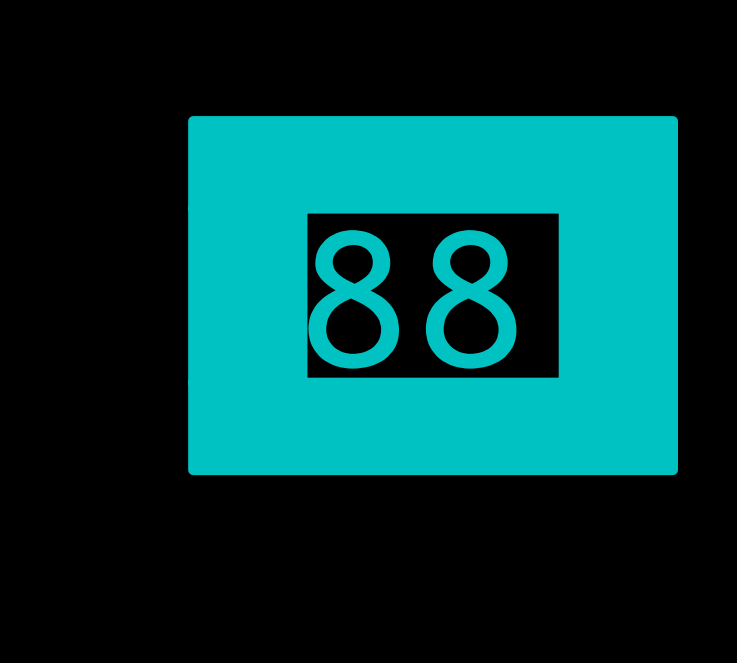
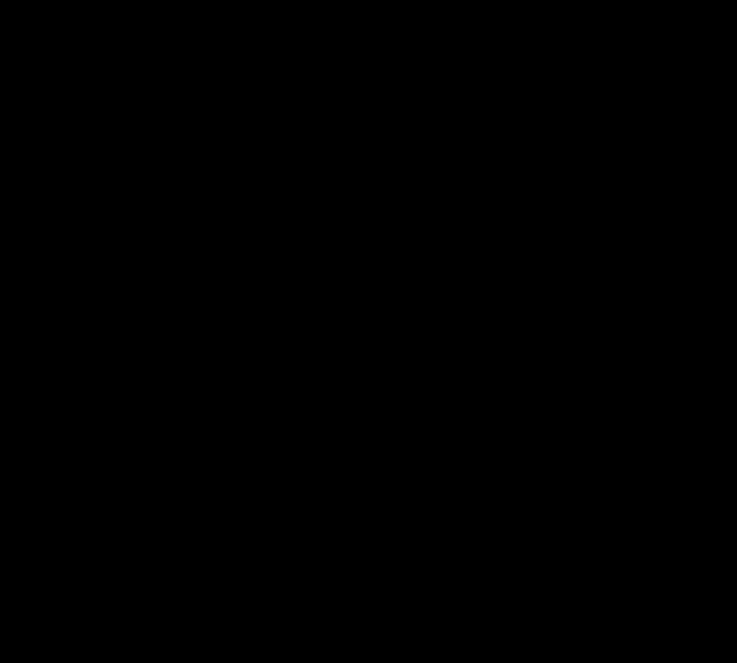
drawing: [188, 116, 678, 476] -> none
text: 88 (412, 299) -> none

